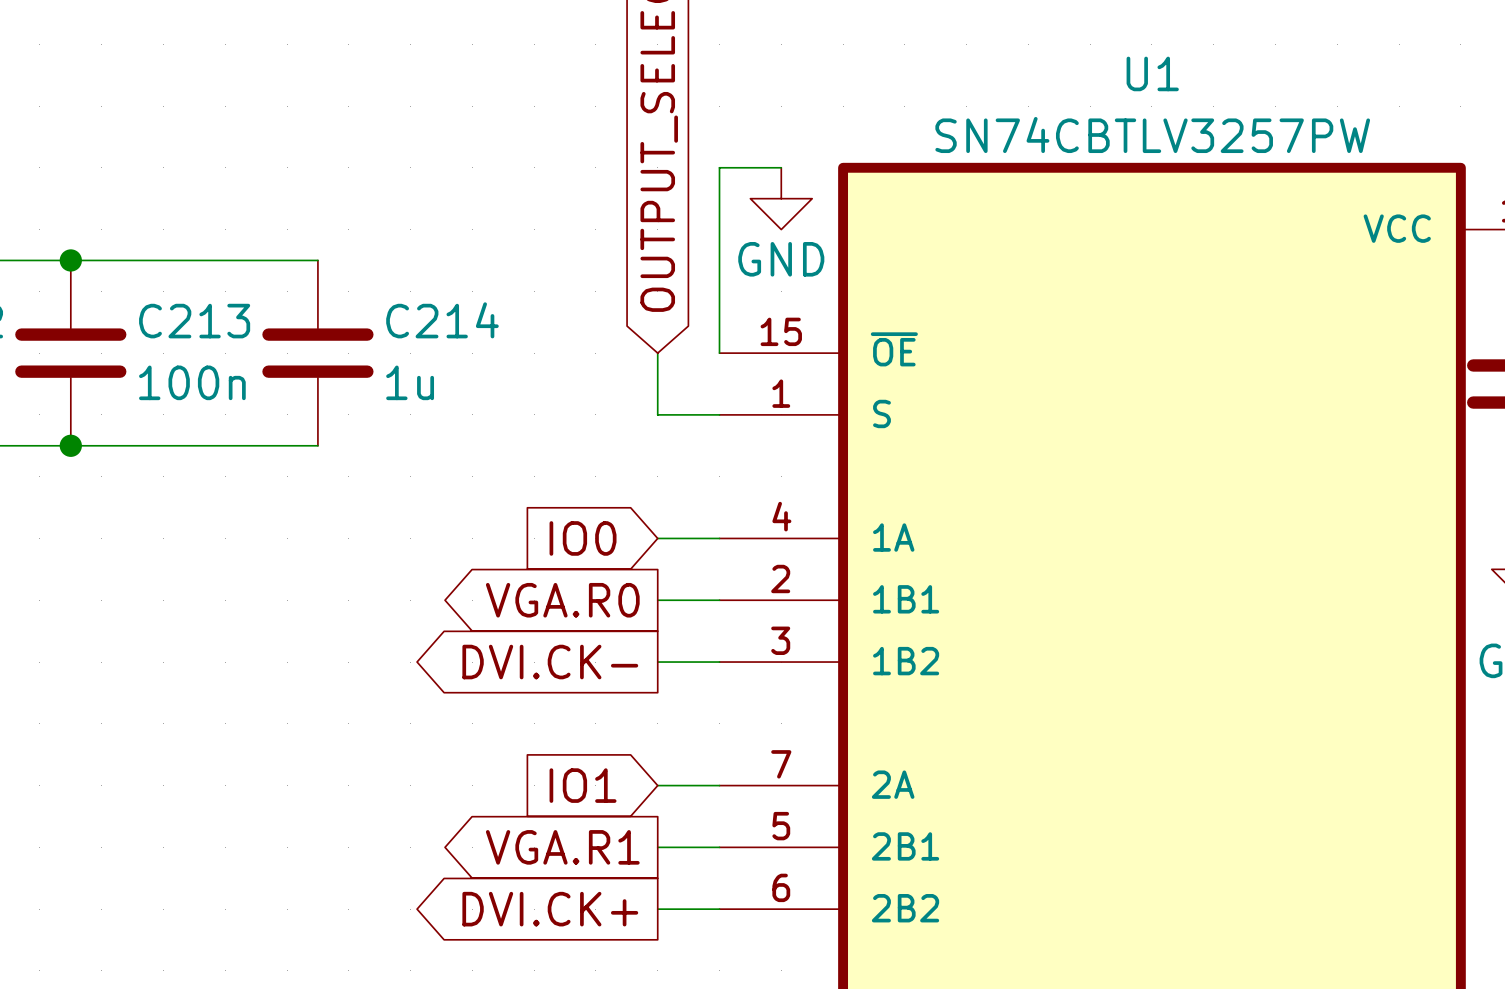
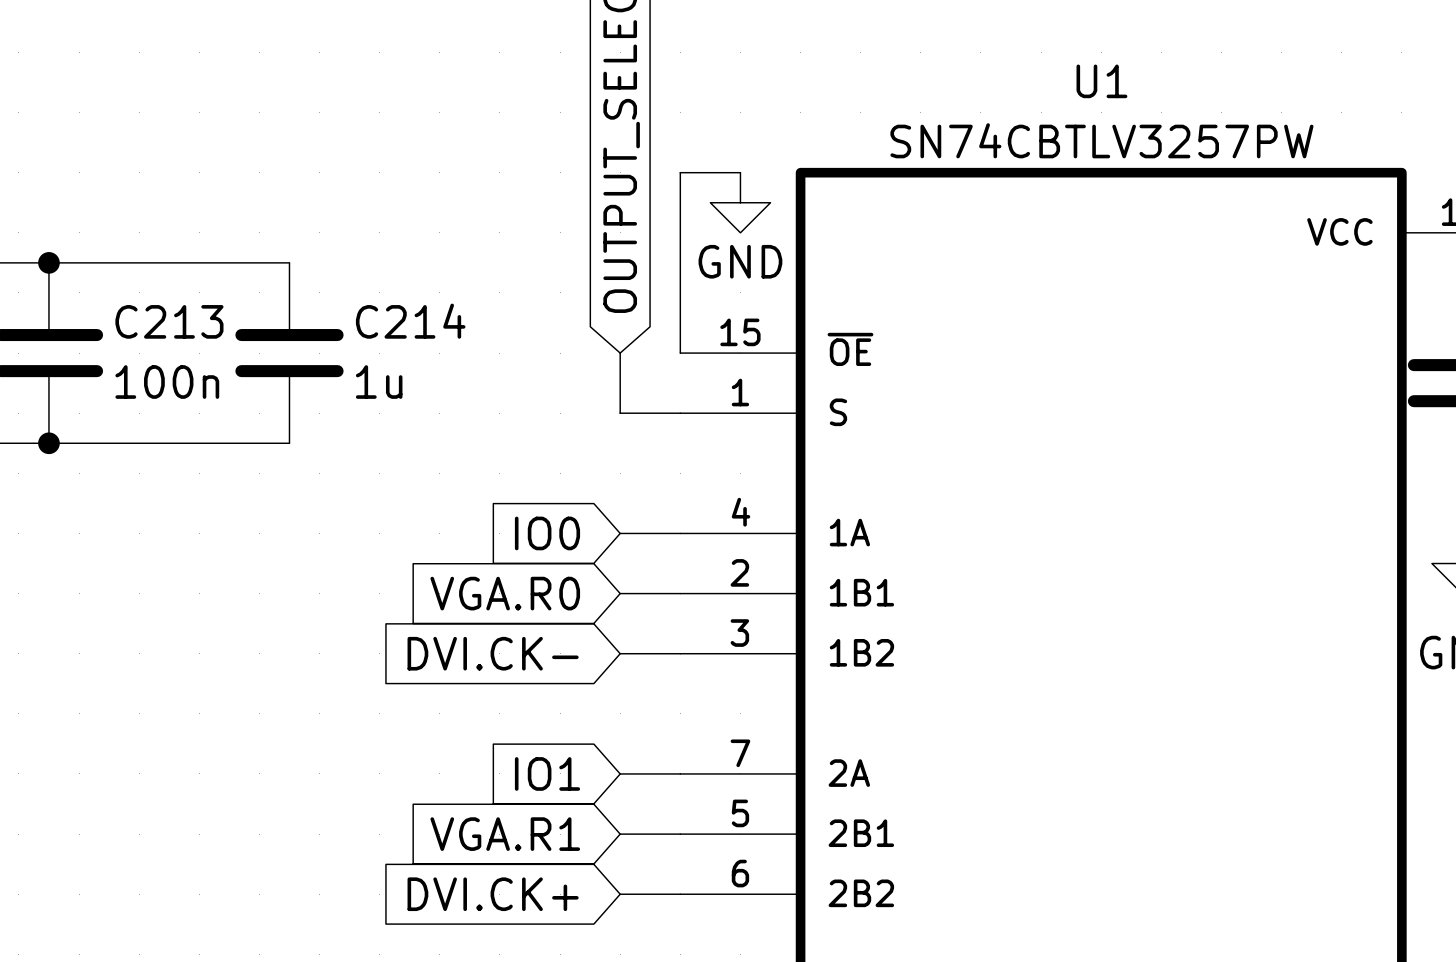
global label shape: output (562, 600) -> input (505, 593)
global label shape: output (550, 662) -> input (493, 653)
global label shape: output (562, 847) -> input (505, 834)
global label shape: output (550, 909) -> input (493, 894)

